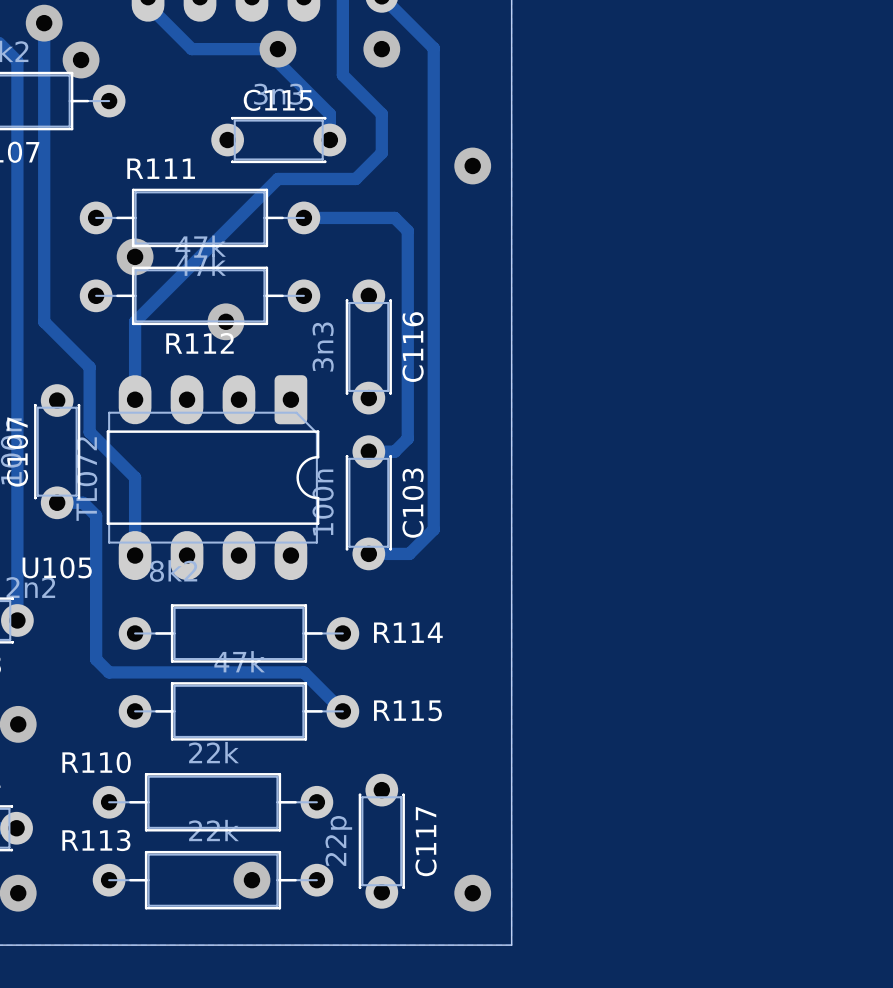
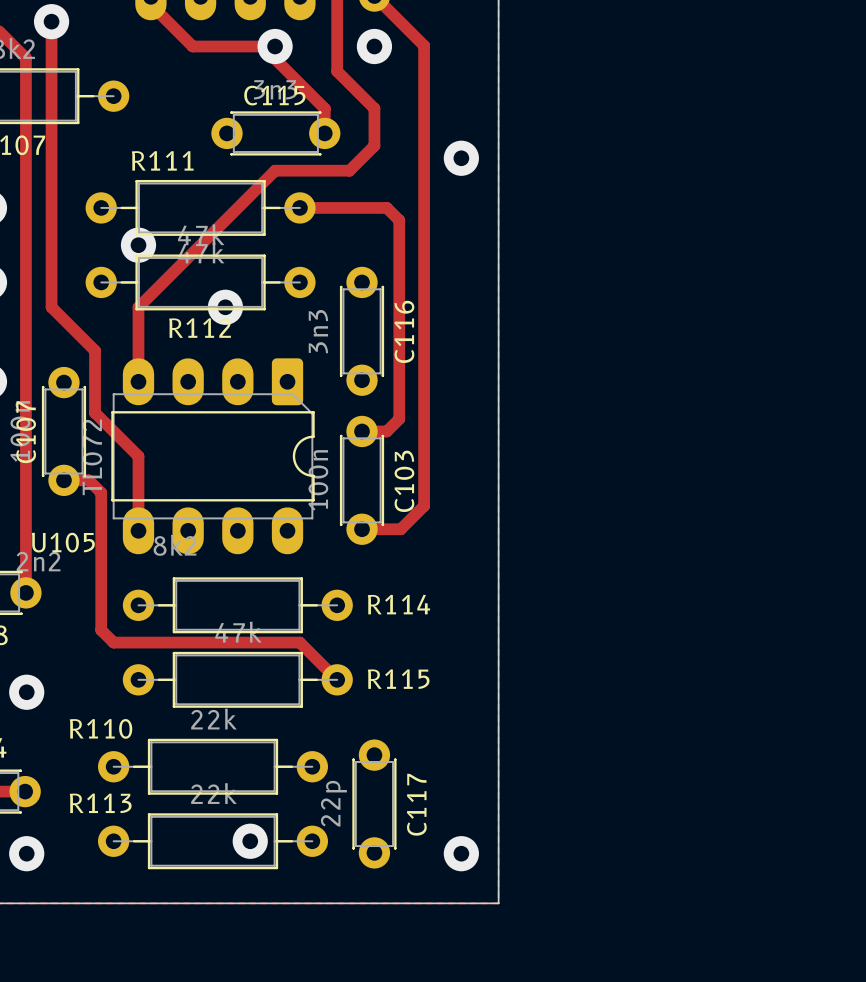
via: (81, 60) -> none

